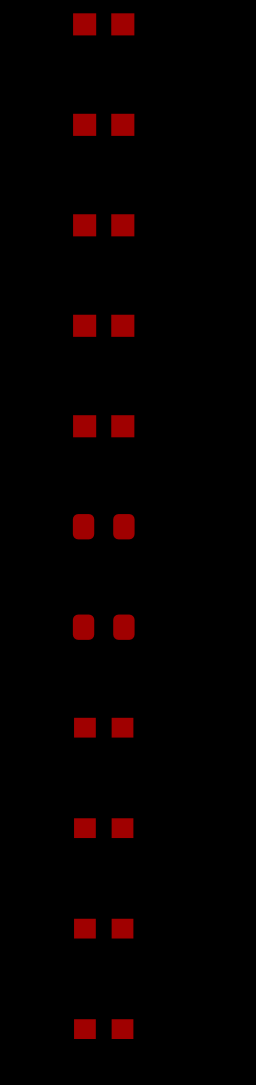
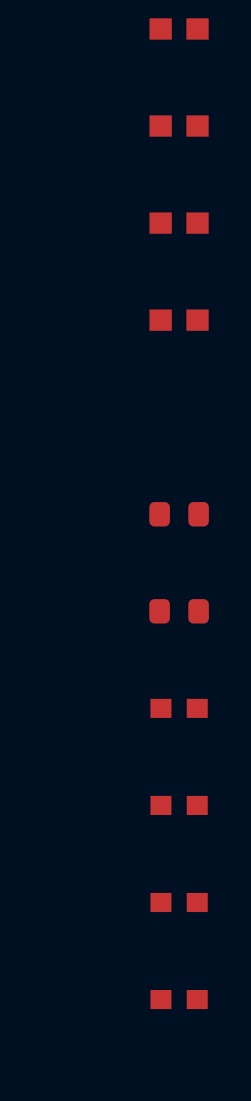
part: (103, 426) -> none

